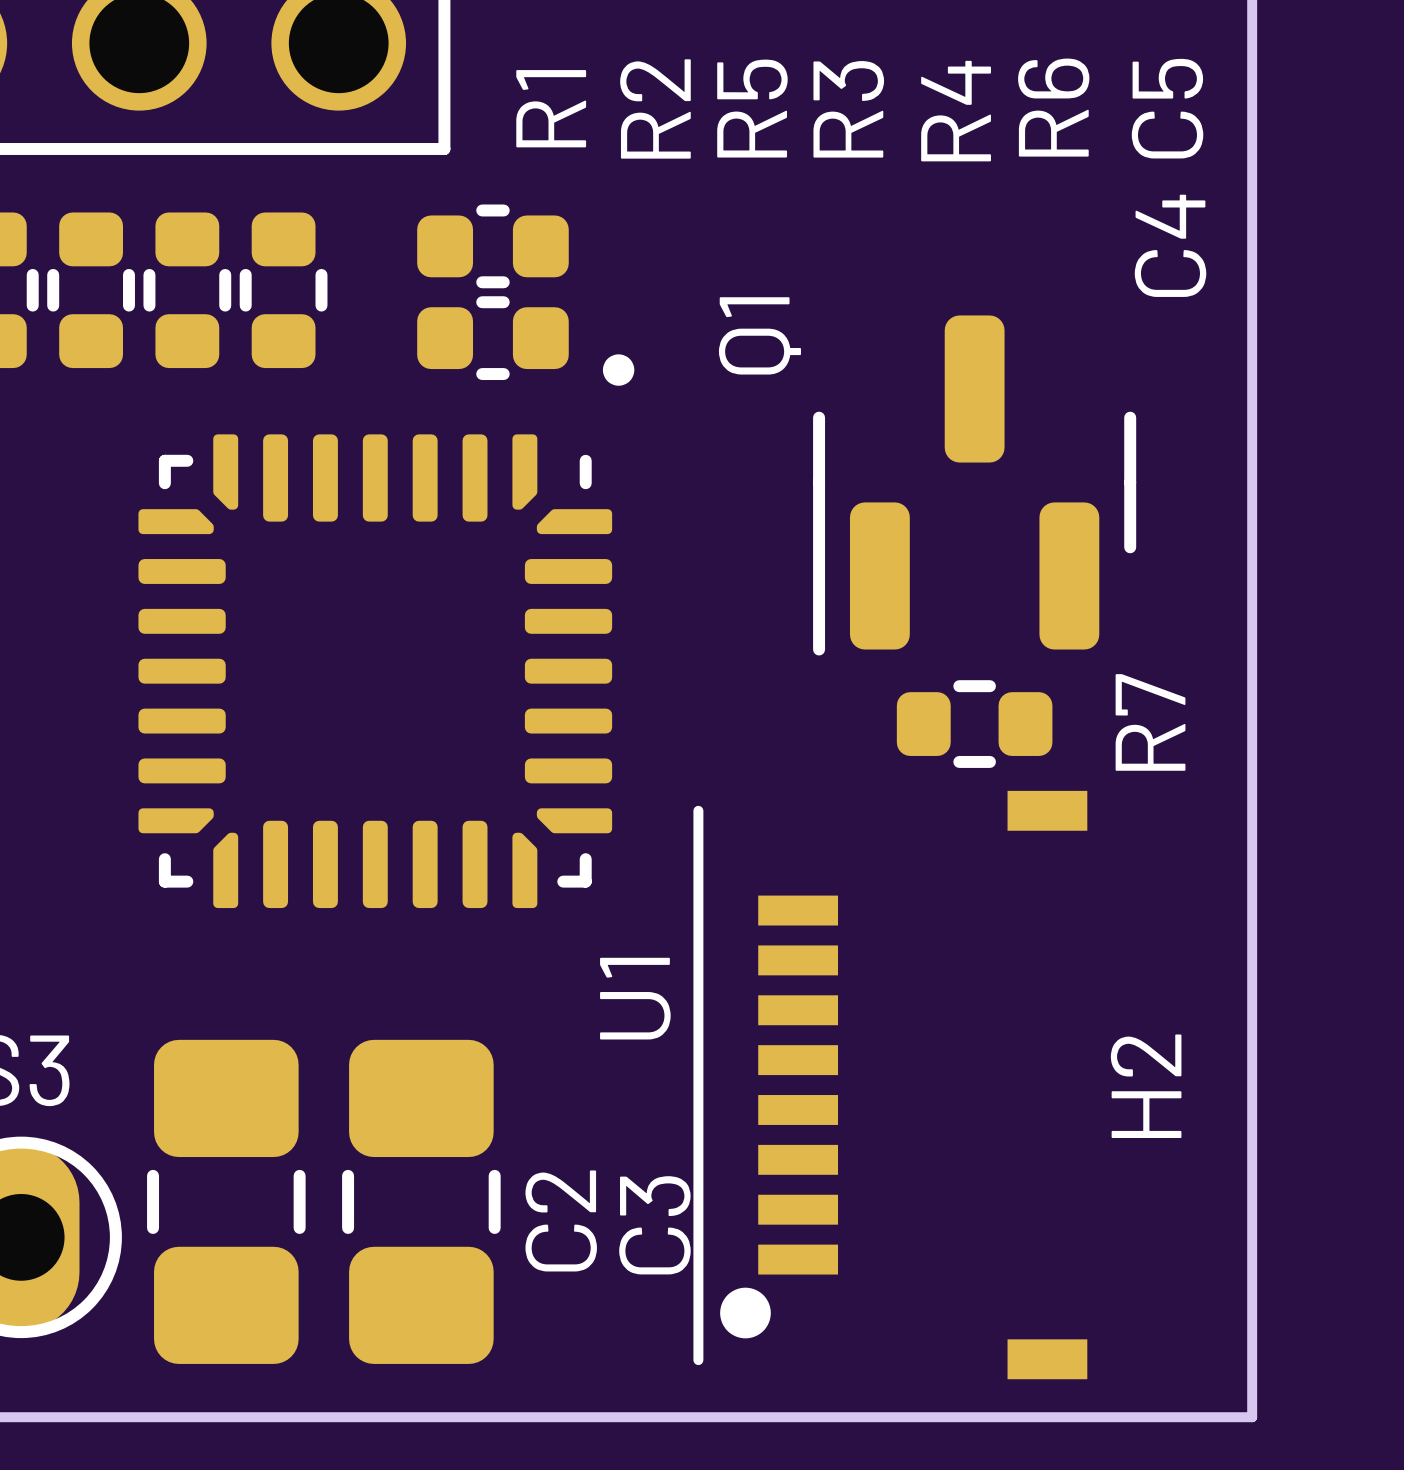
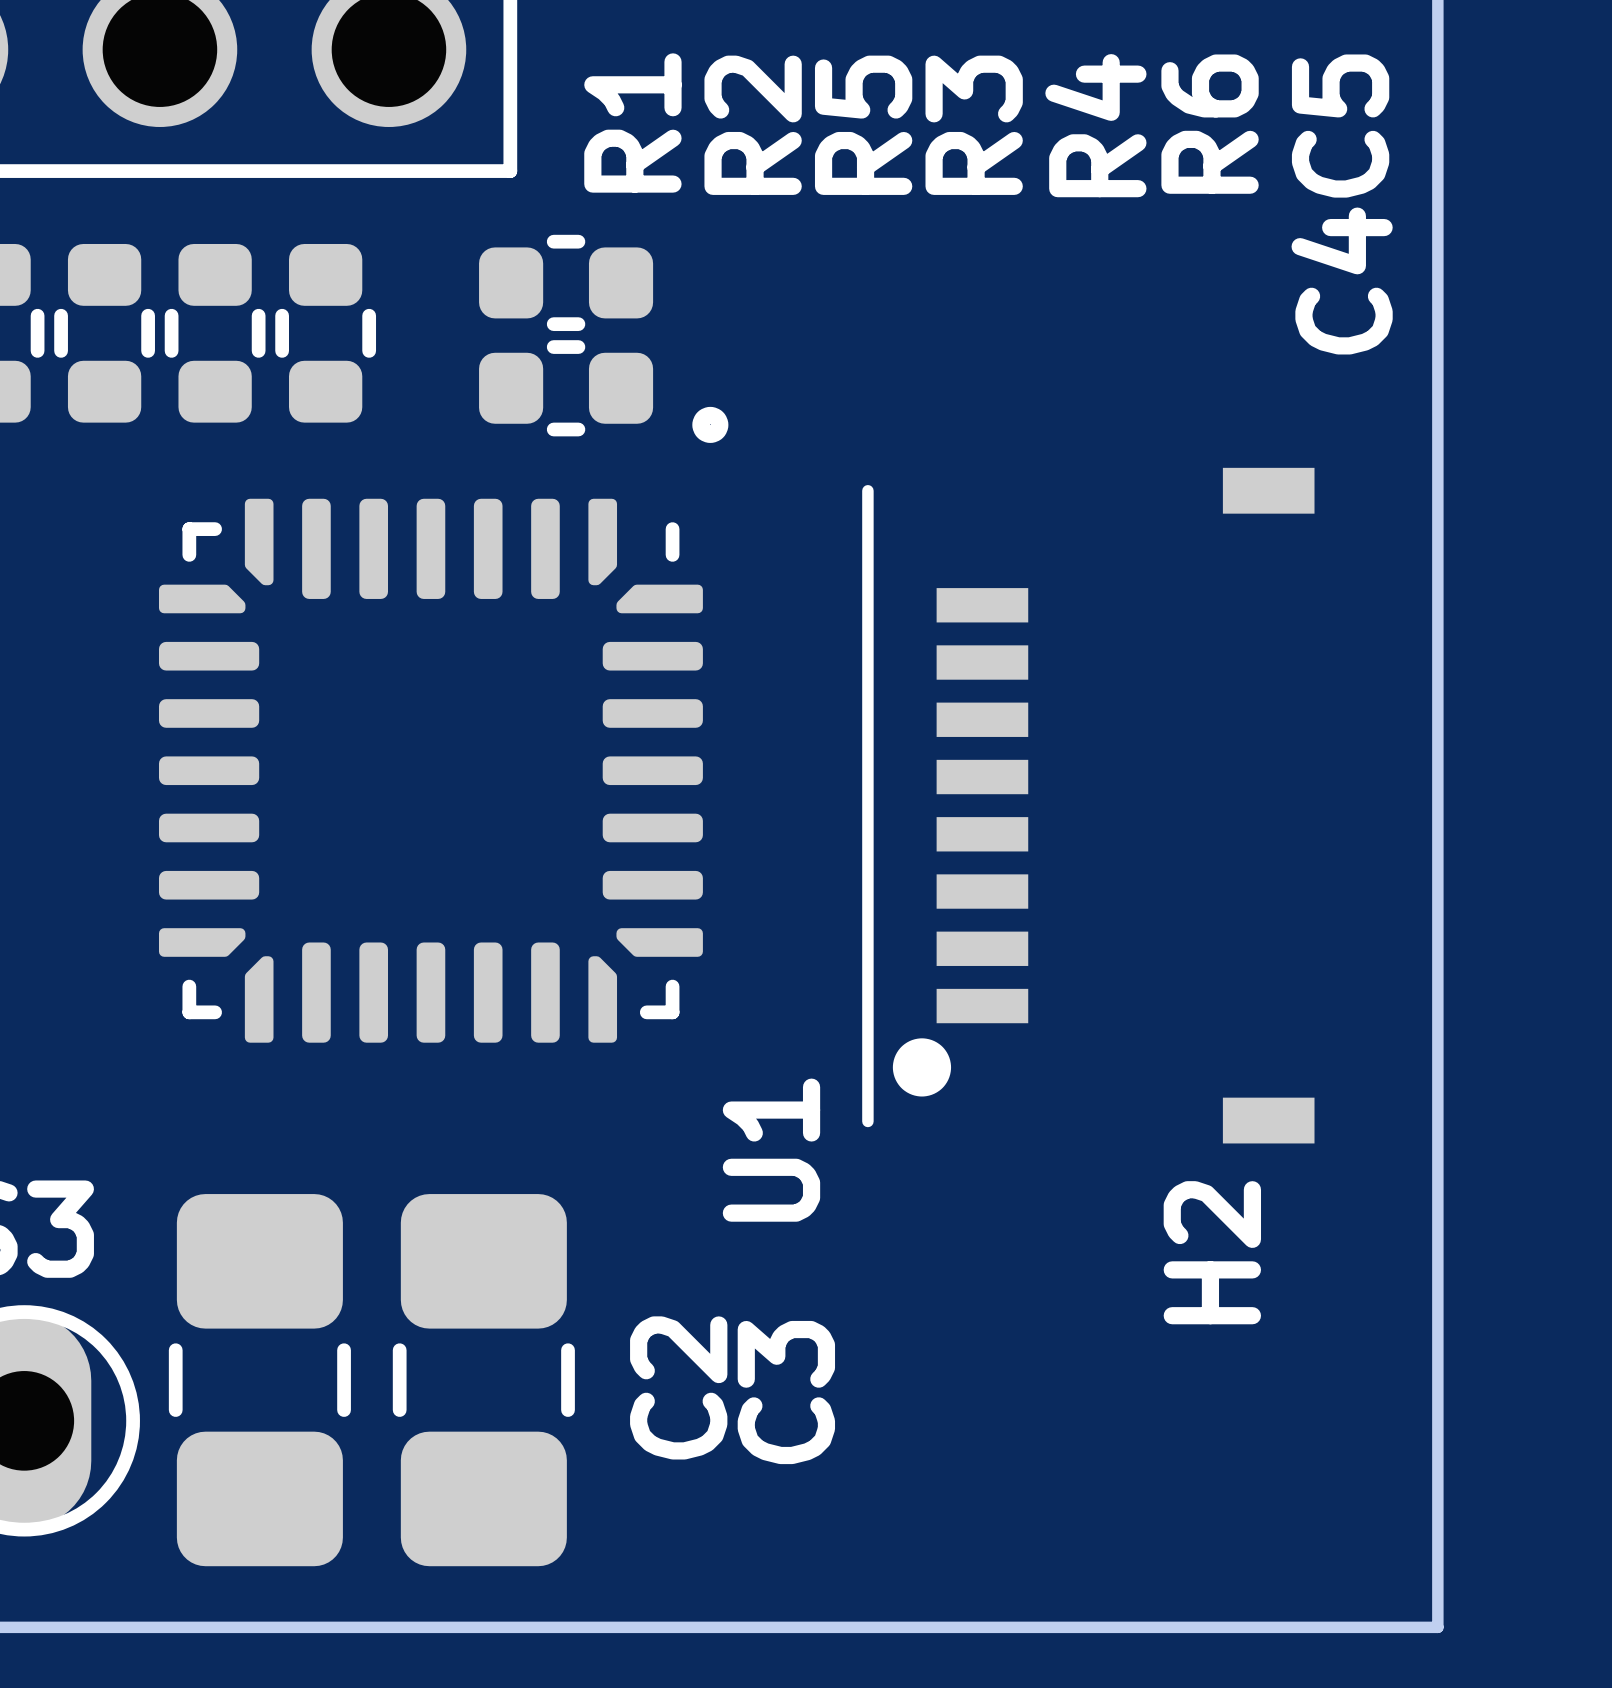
Q1: (974, 485) -> none
R7: (974, 724) -> none
U1 name position: U1 (635, 998) -> U1 (771, 1150)
H2 position: (890, 1085) -> (1088, 805)
H2 name position: H2 (1146, 1086) -> H2 (1212, 1252)
C2 name position: C2 (561, 1220) -> C2 (678, 1387)
C3 name position: C3 (654, 1225) -> C3 (786, 1392)

